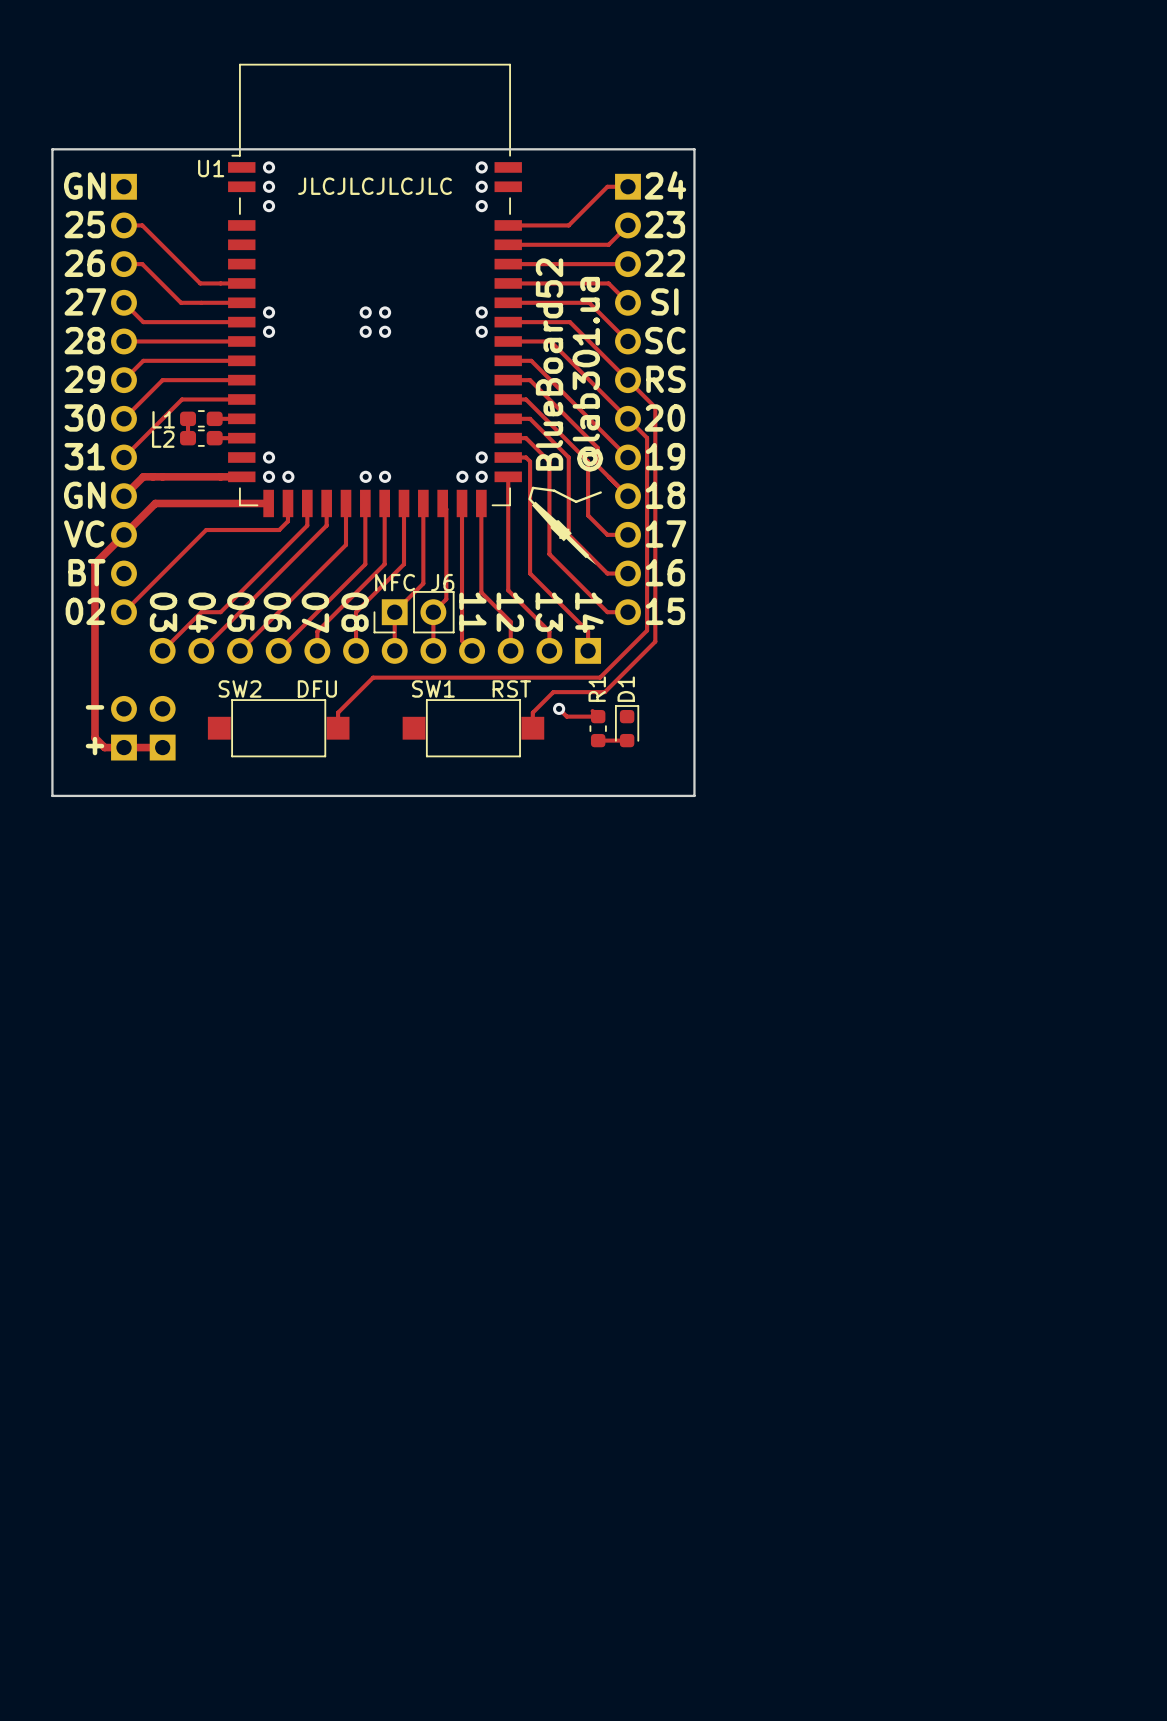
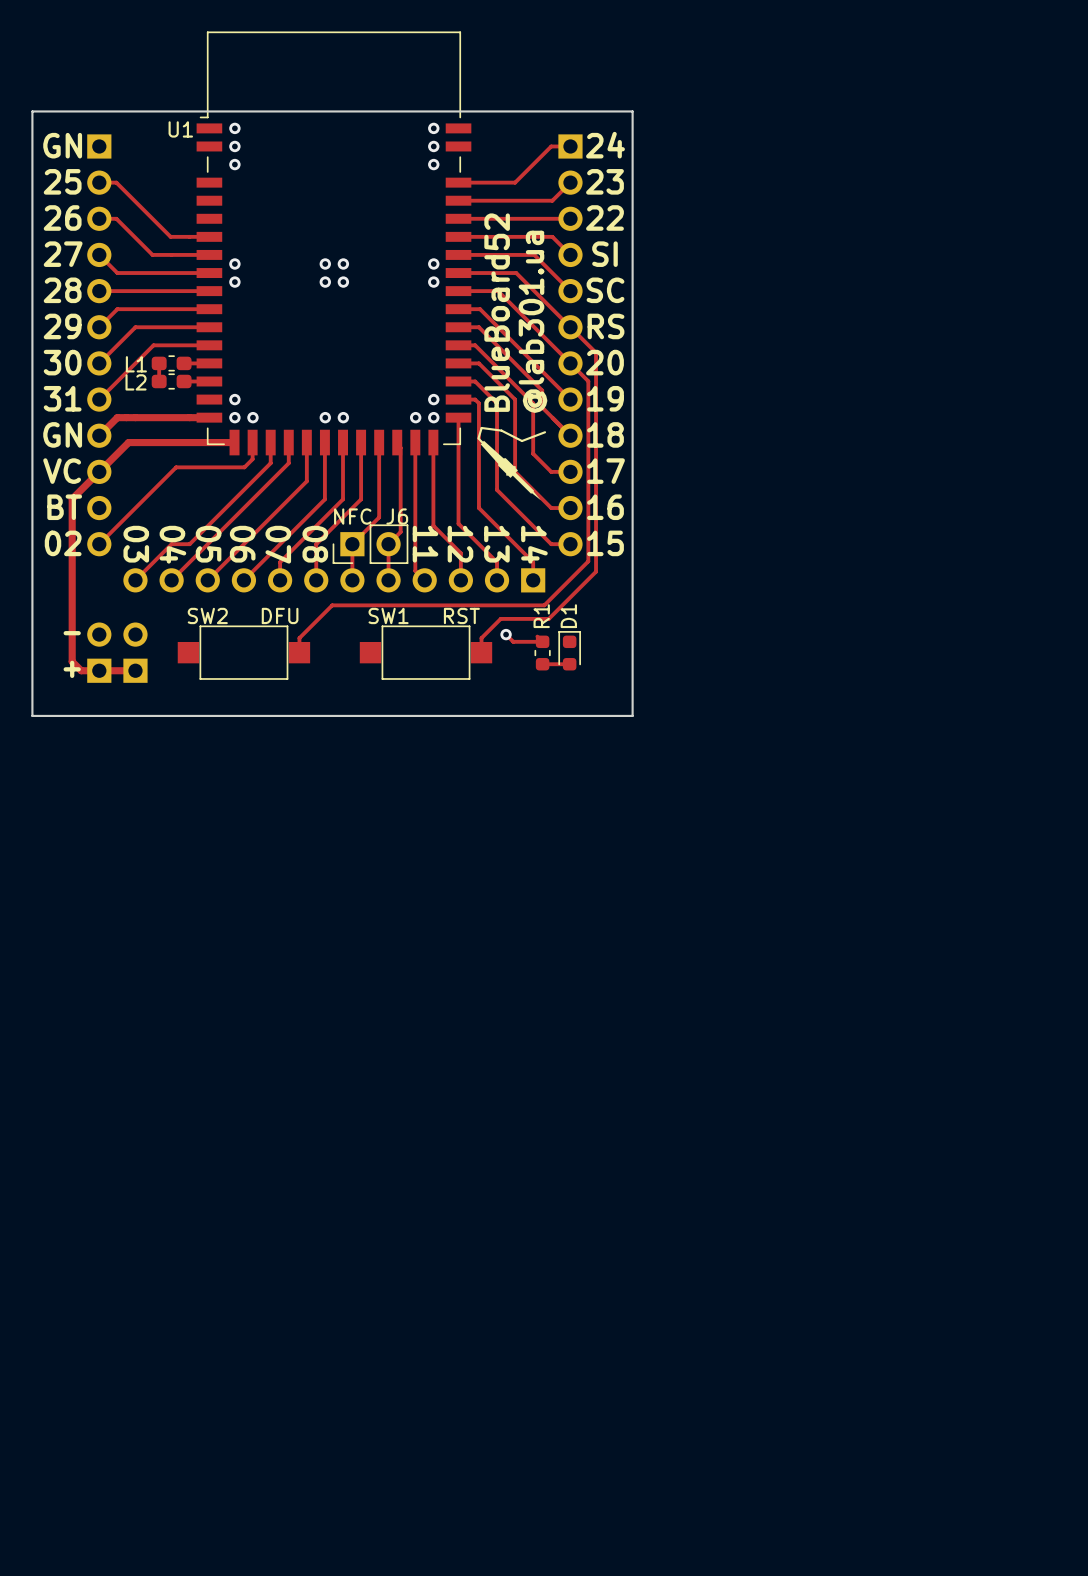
text: JLCJLCJLCJLC (375, 186) -> none

